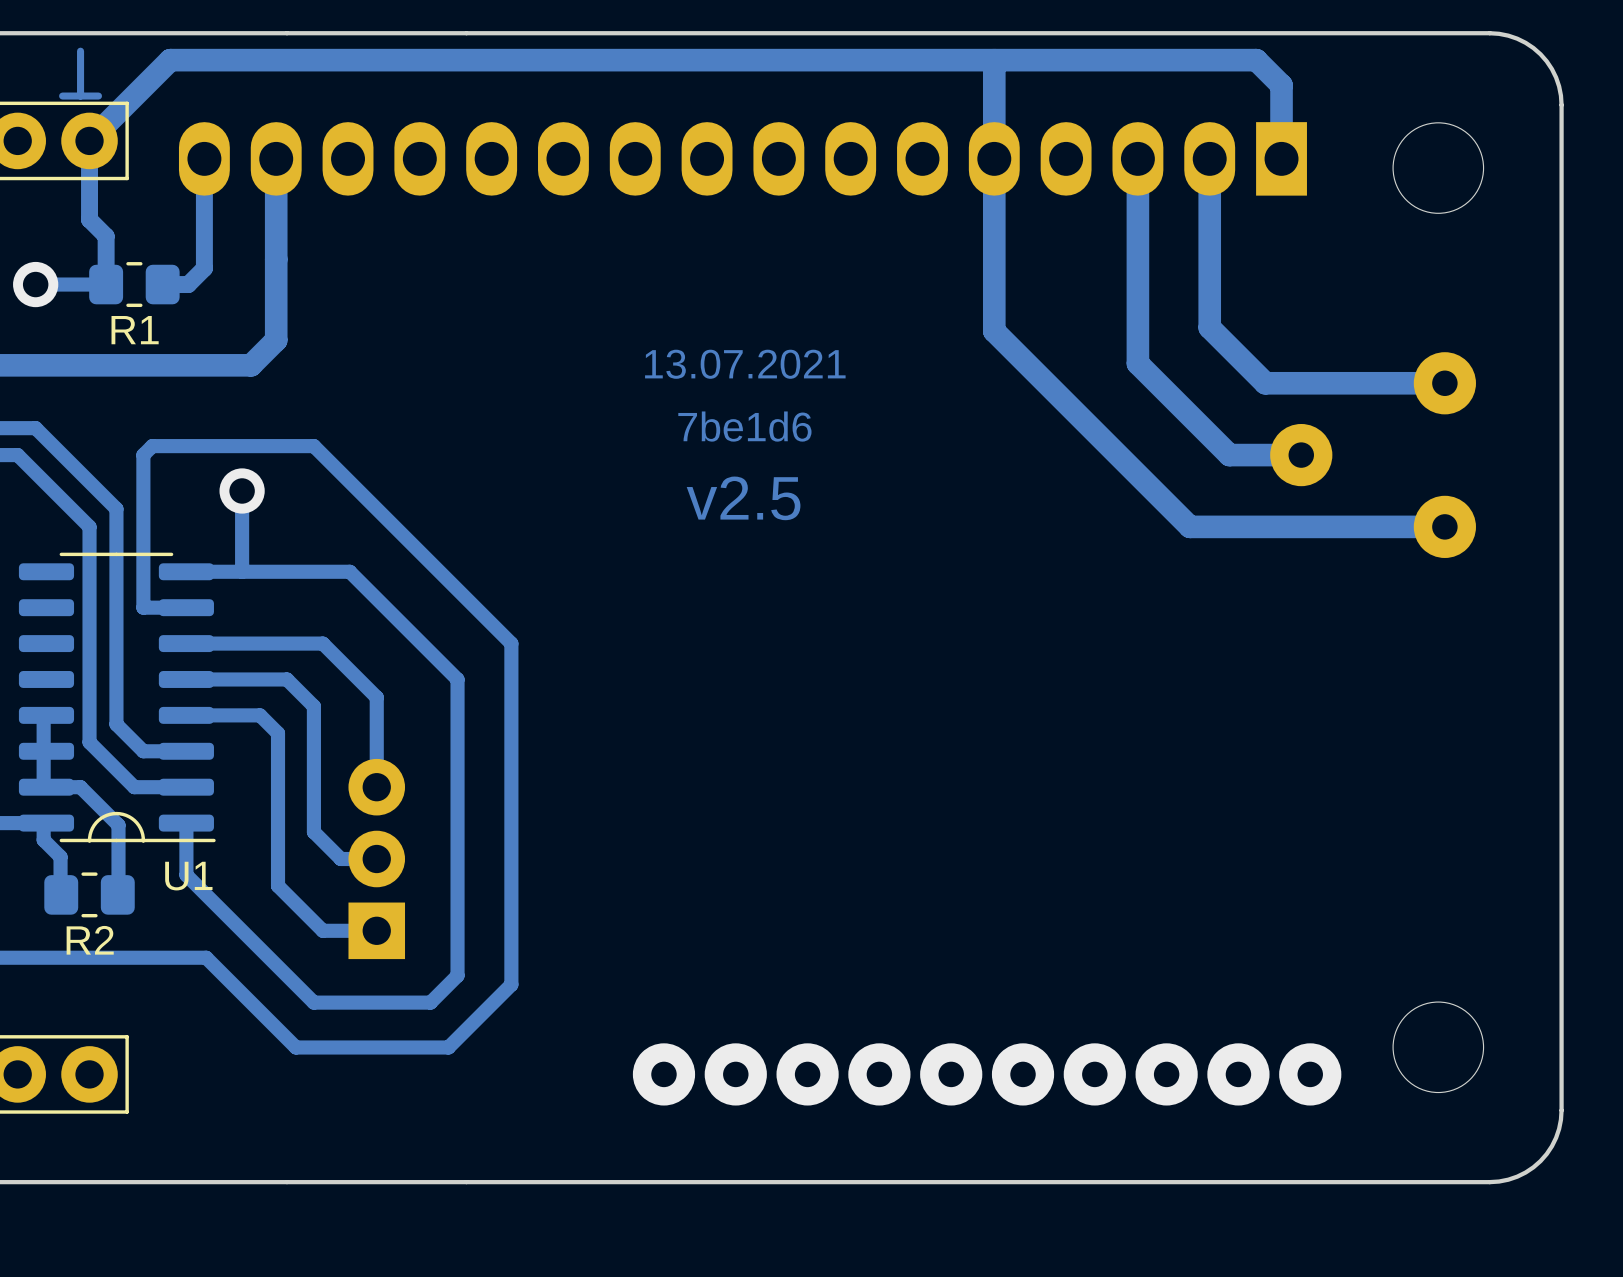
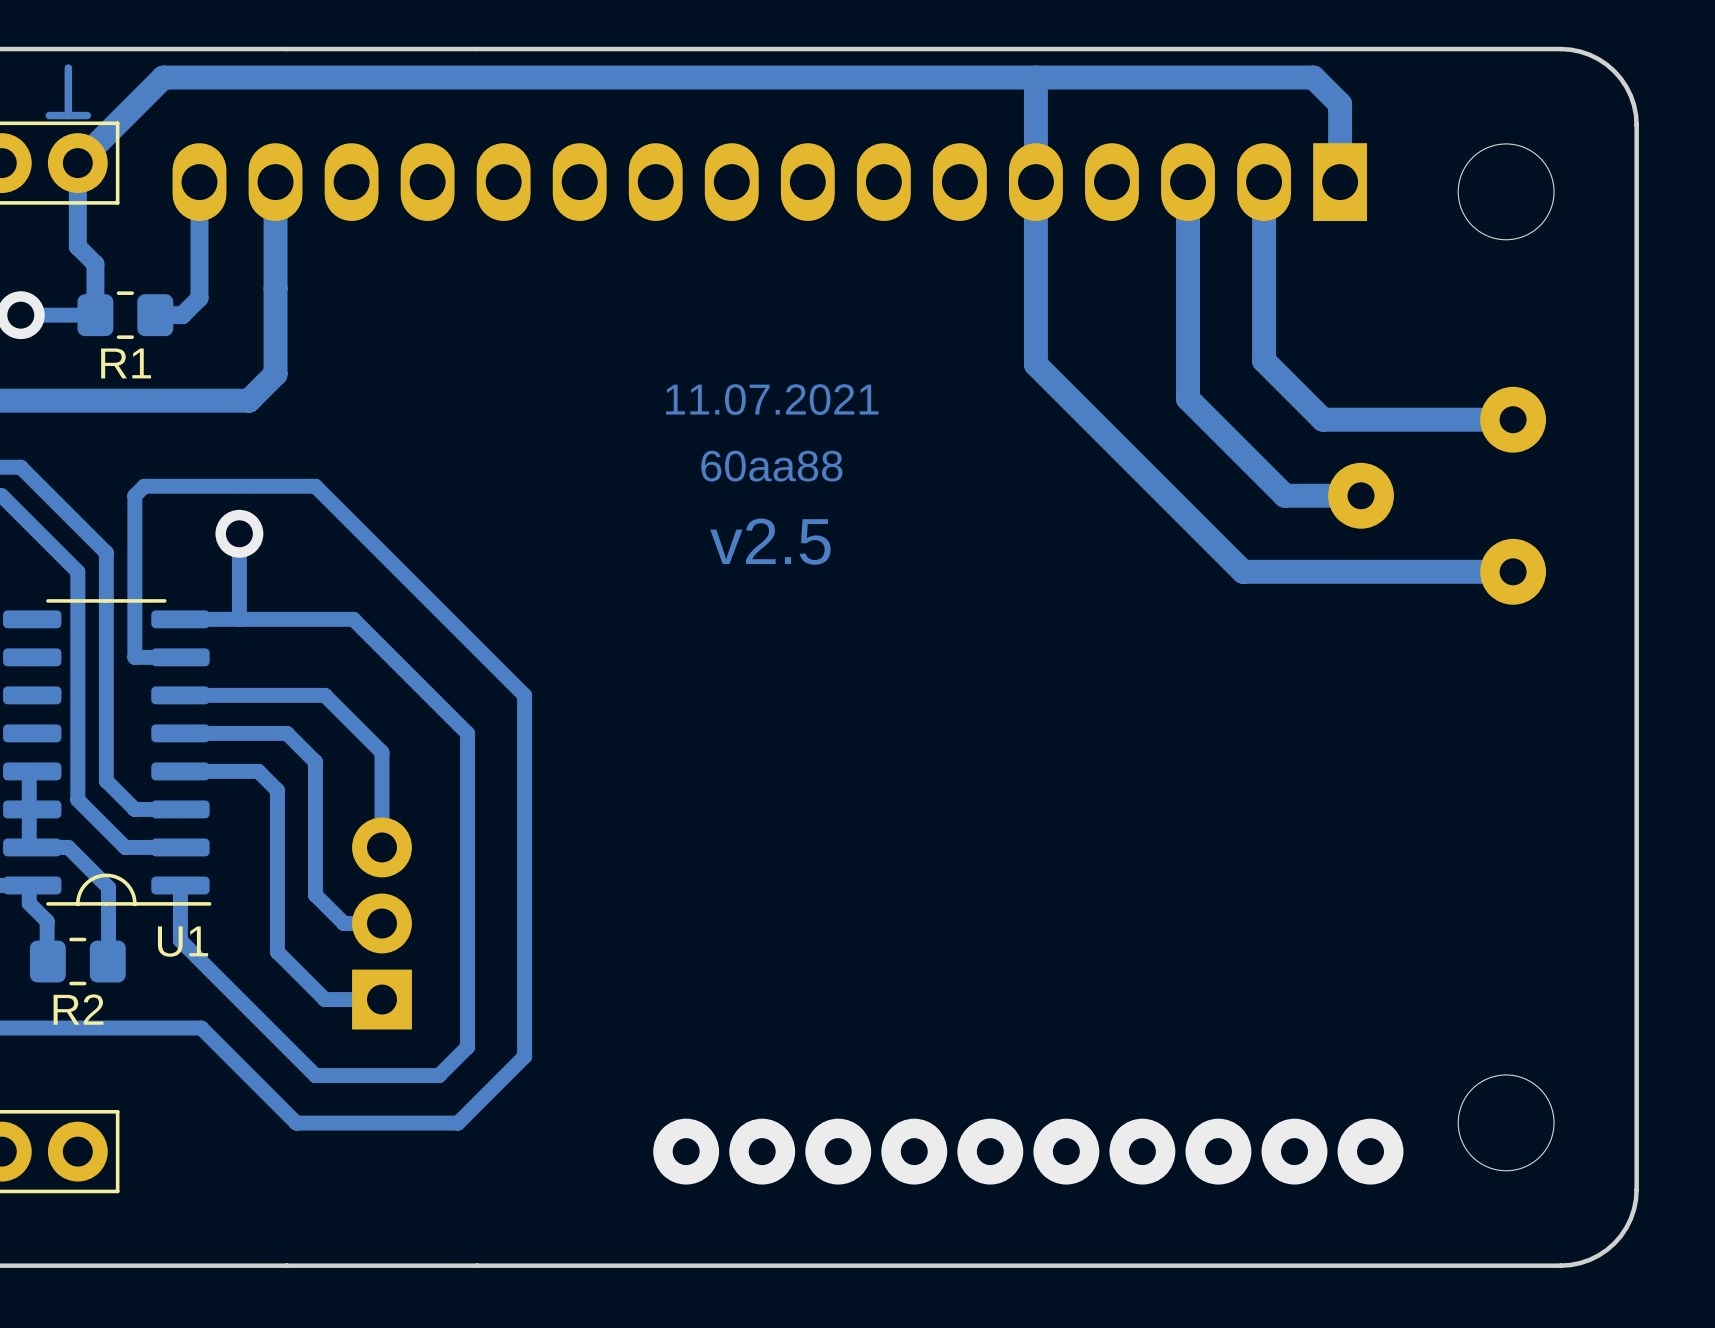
text: 13.07.2021 (745, 364) -> 11.07.2021 (772, 399)
text: 7be1d6 (744, 426) -> 60aa88 (771, 466)

